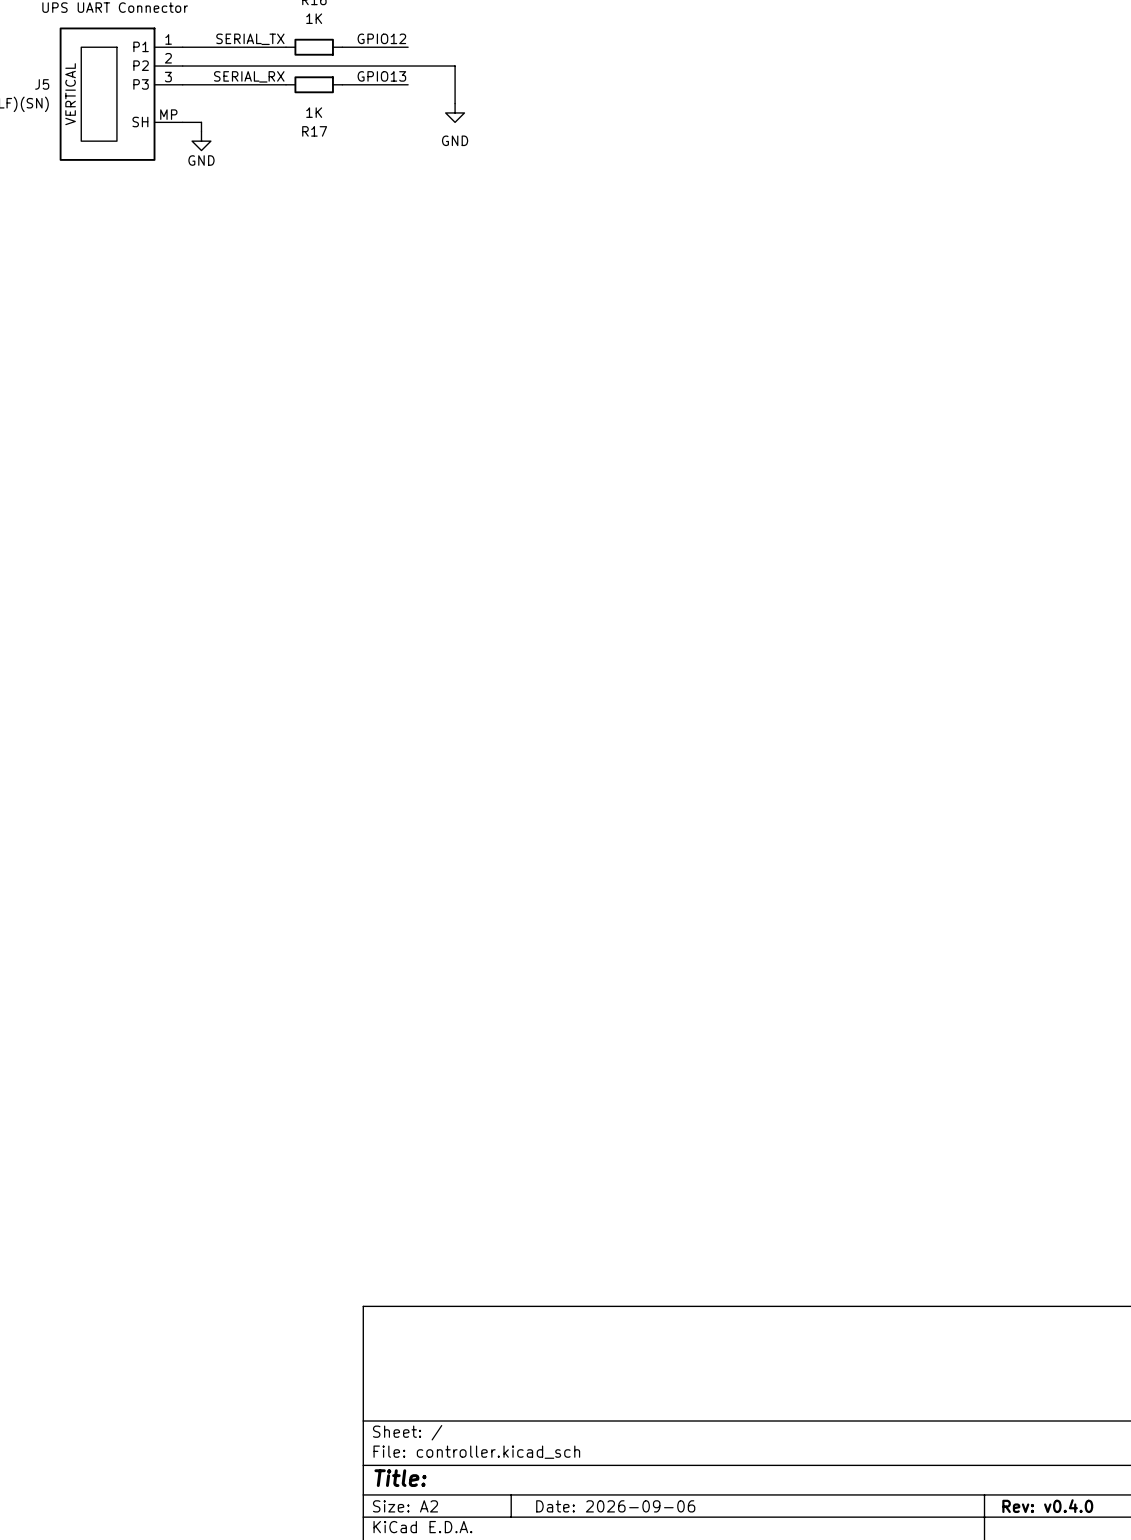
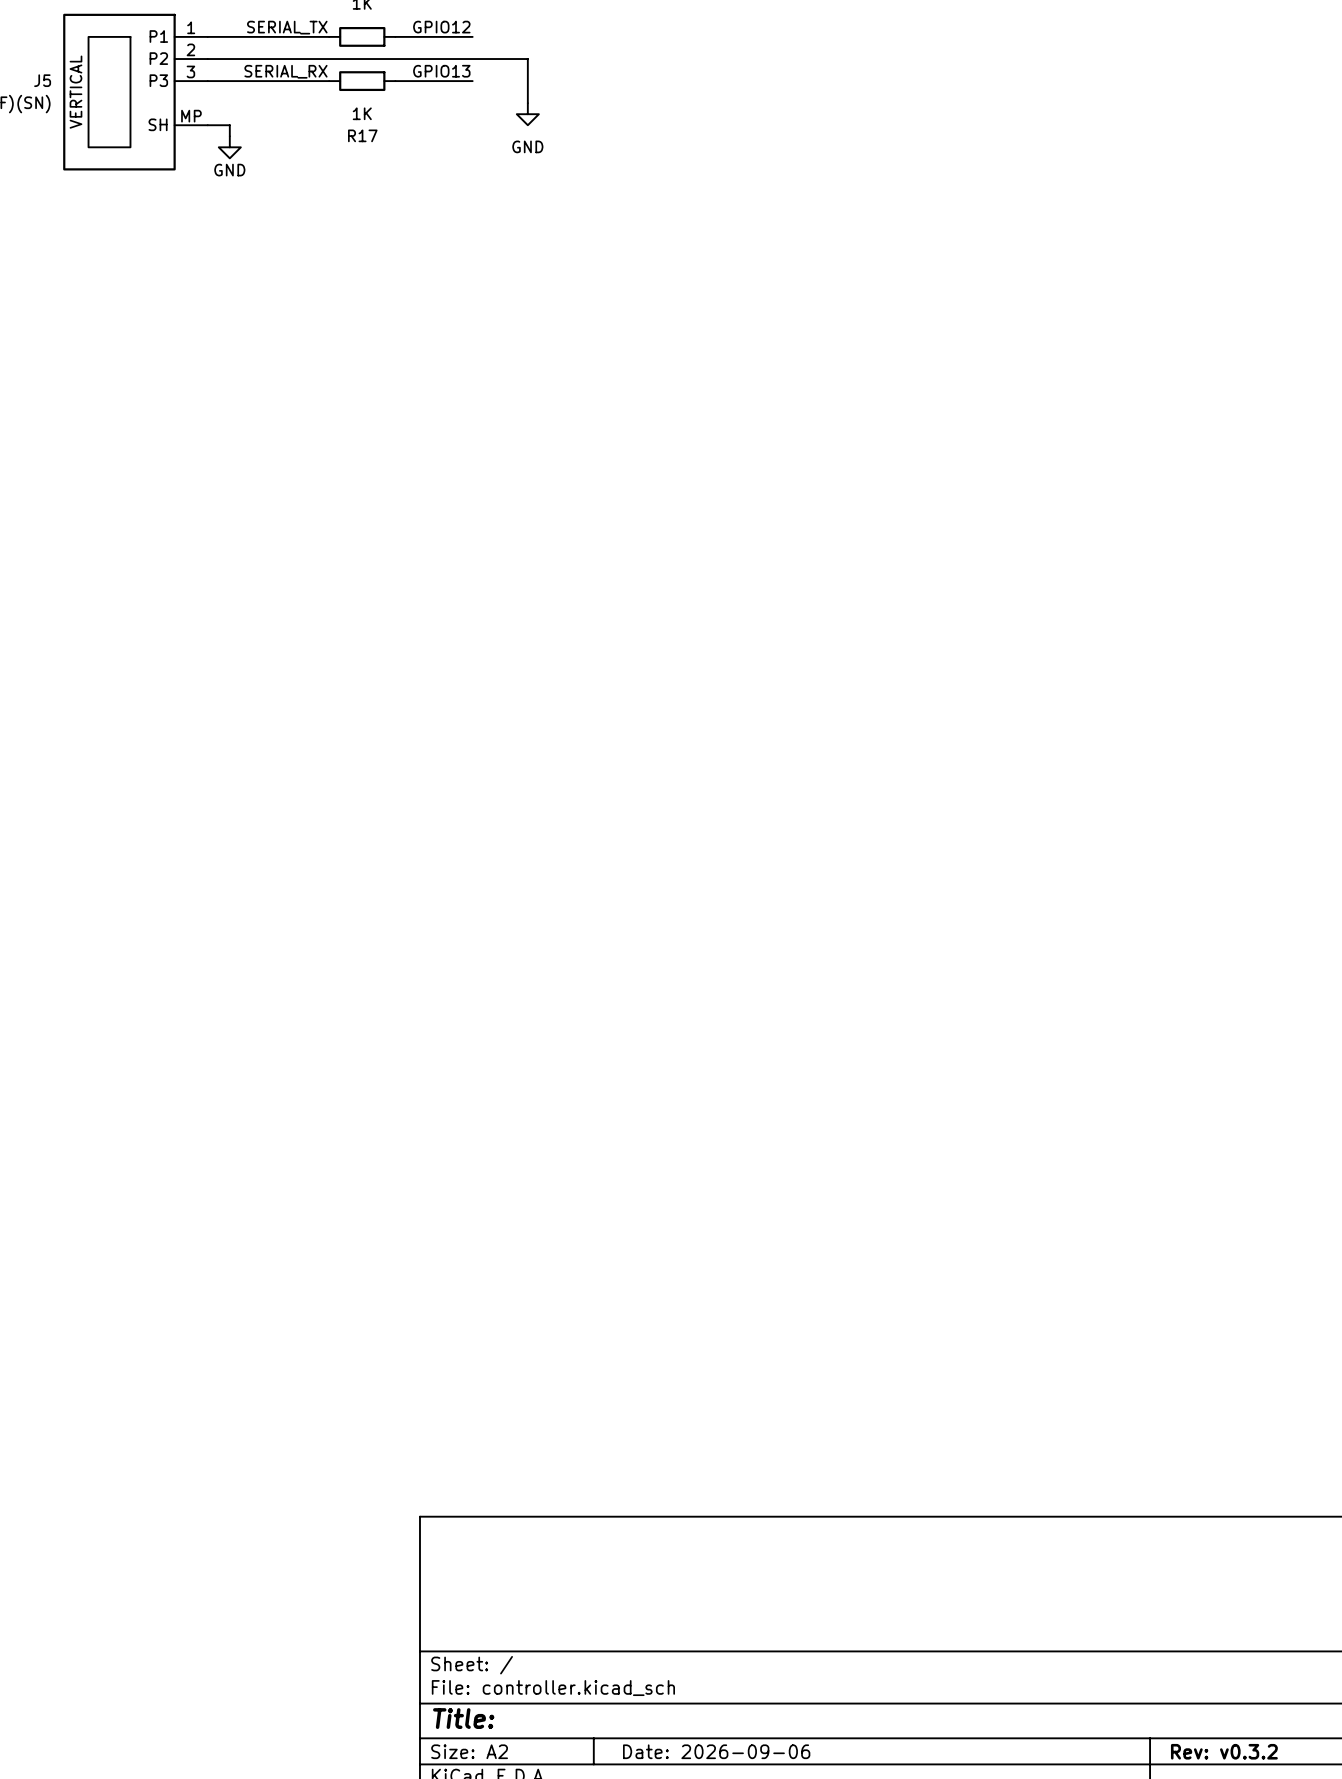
title block: Rev: v0.4.0 (1047, 1506) -> Rev: v0.3.2 (1224, 1751)

